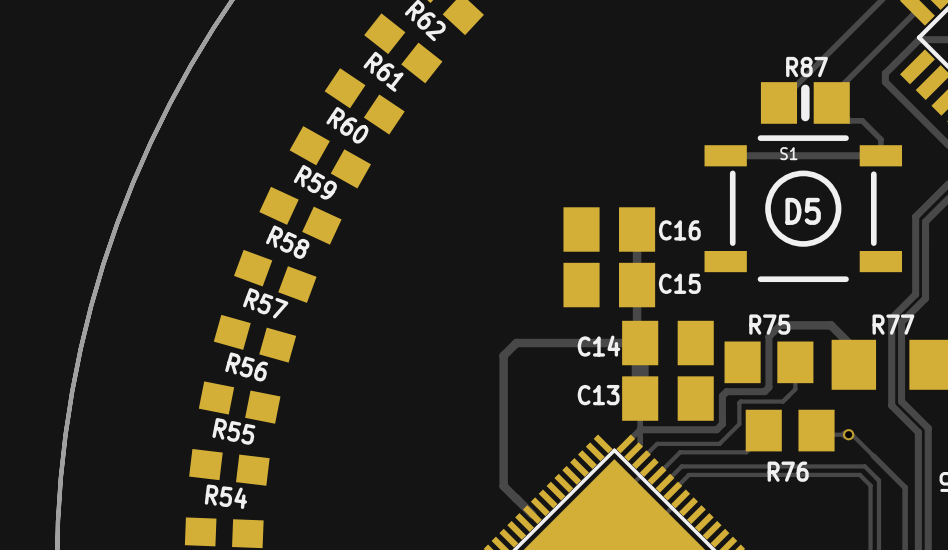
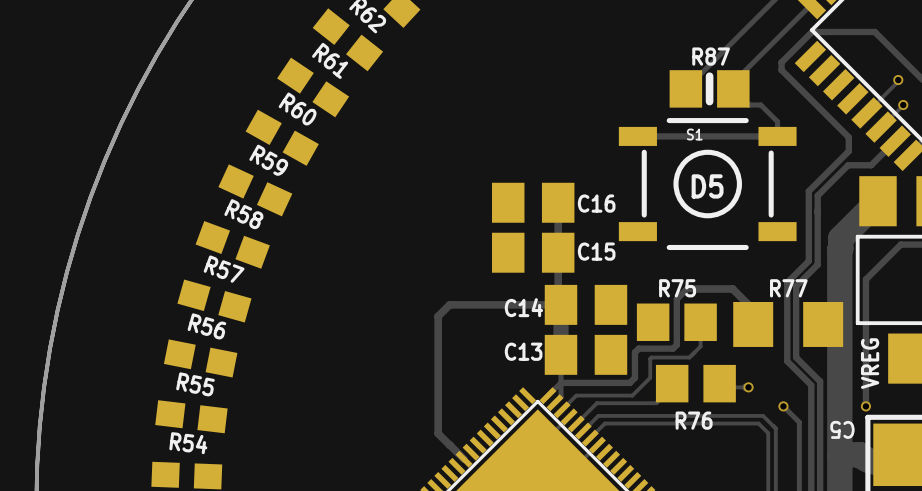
track: (848, 434) (852, 434) (905, 487) -> (783, 406) (799, 422) (799, 434)
via: none -> (783, 406)

